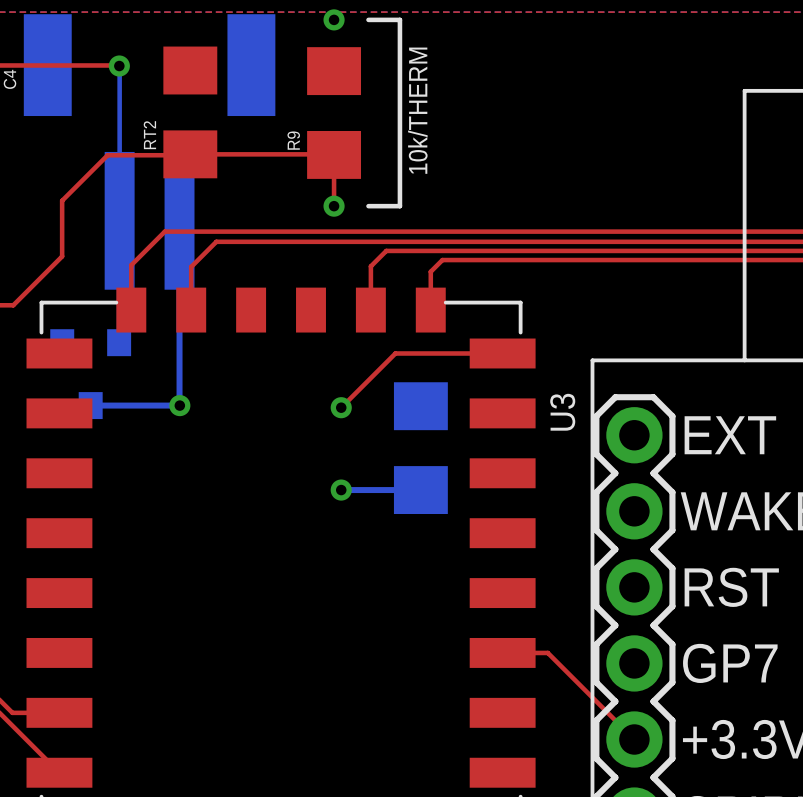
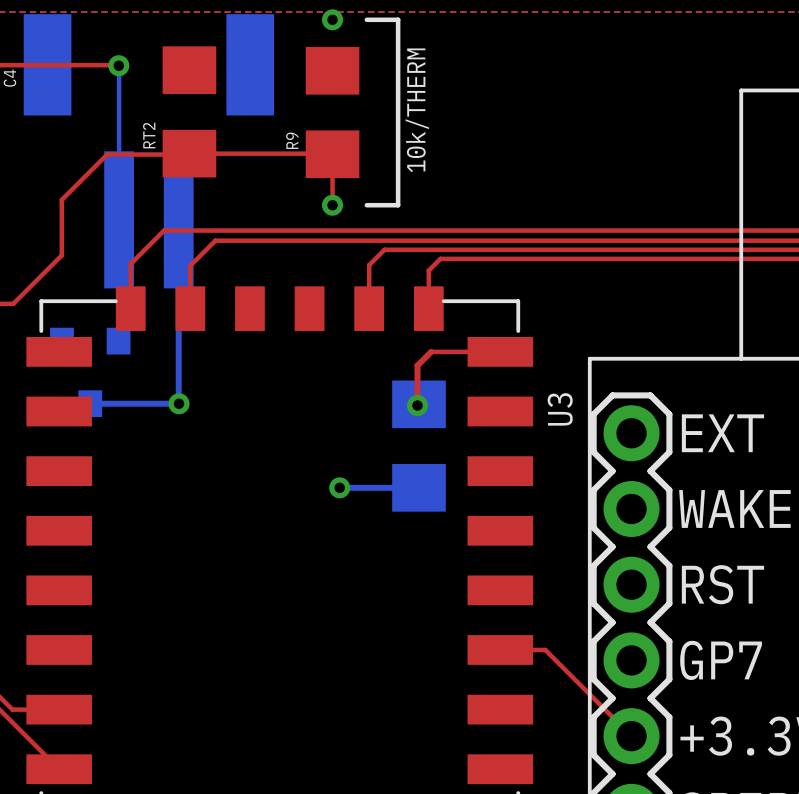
top track: (433, 353) (395, 353) (341, 407) -> (431, 351) (417, 365) (417, 405)
via position: (341, 407) -> (417, 405)

